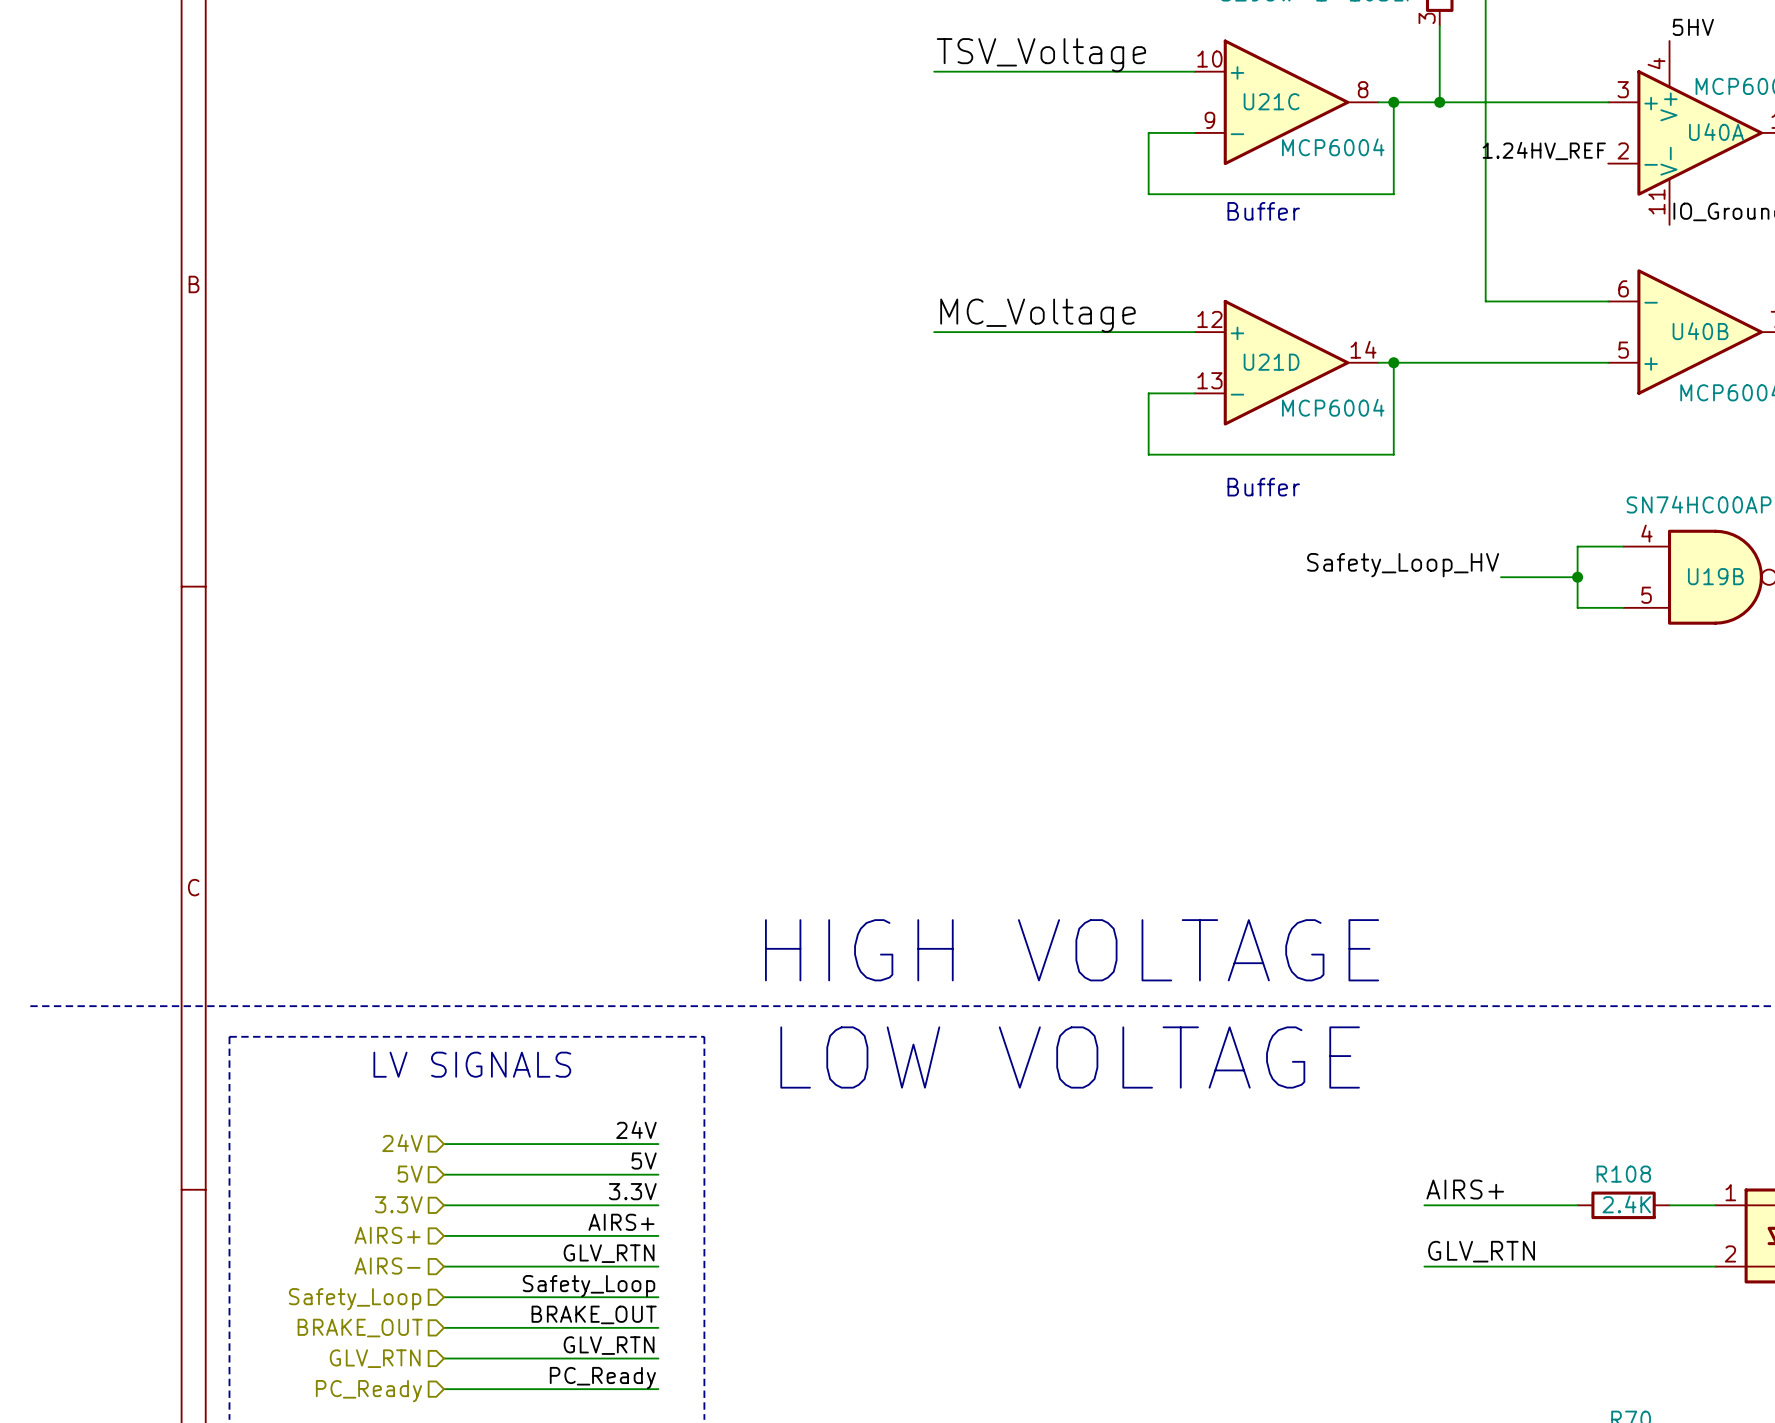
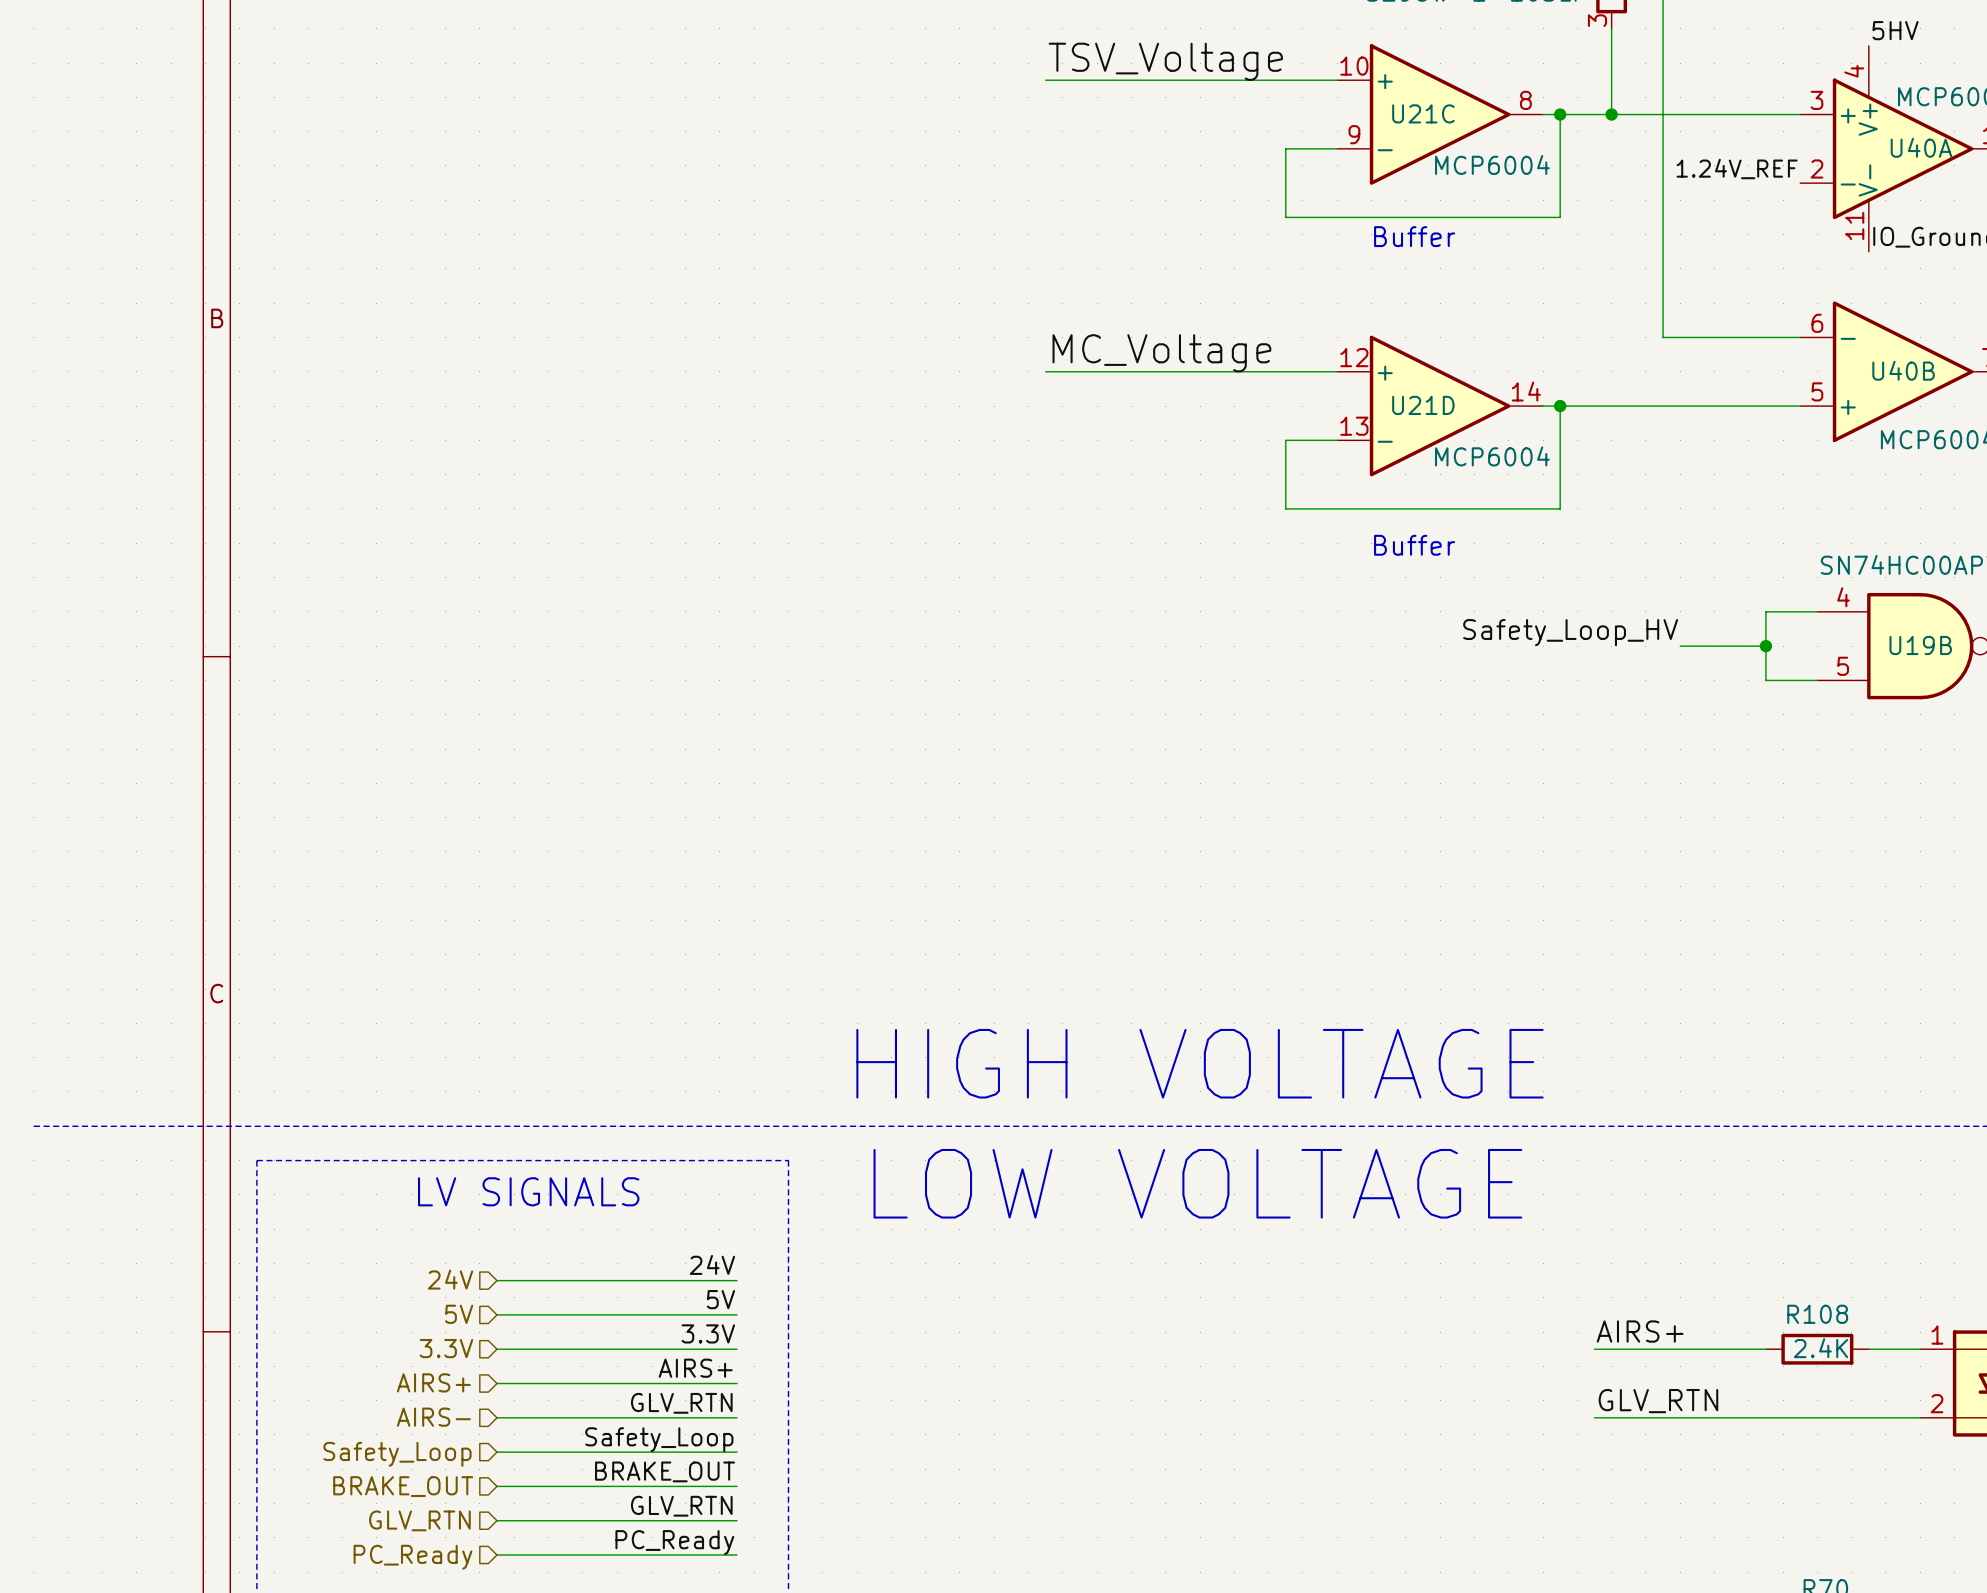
label: 1.24HV_REF (1544, 150) -> 1.24V_REF (1737, 169)

